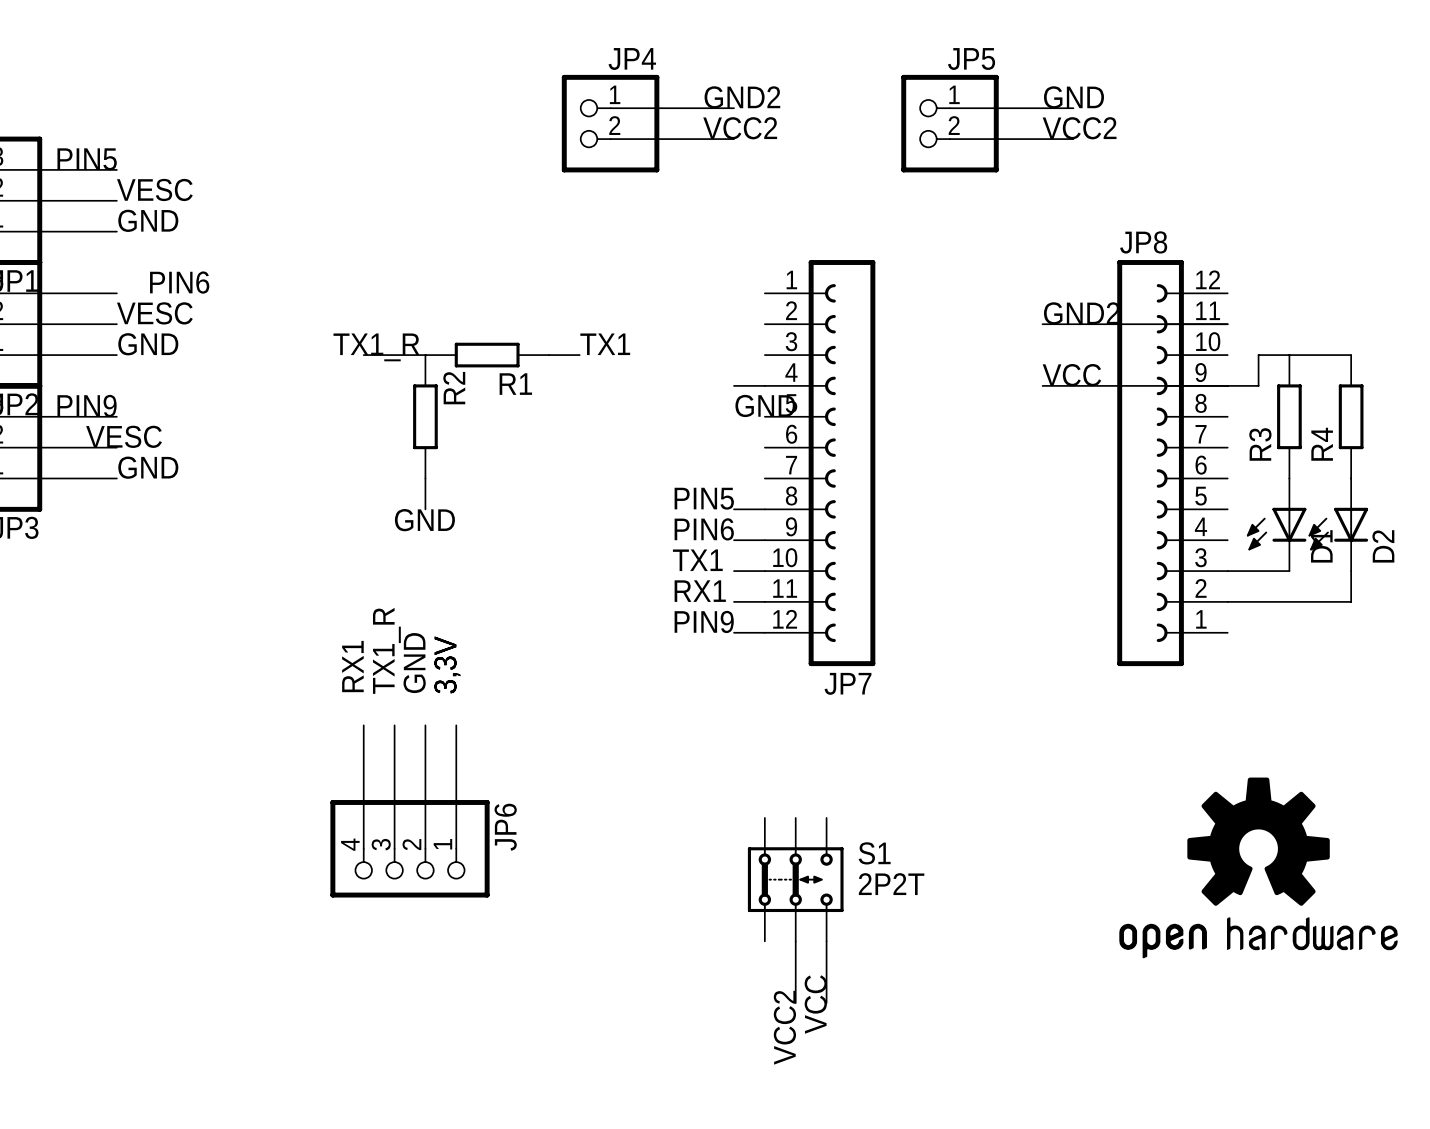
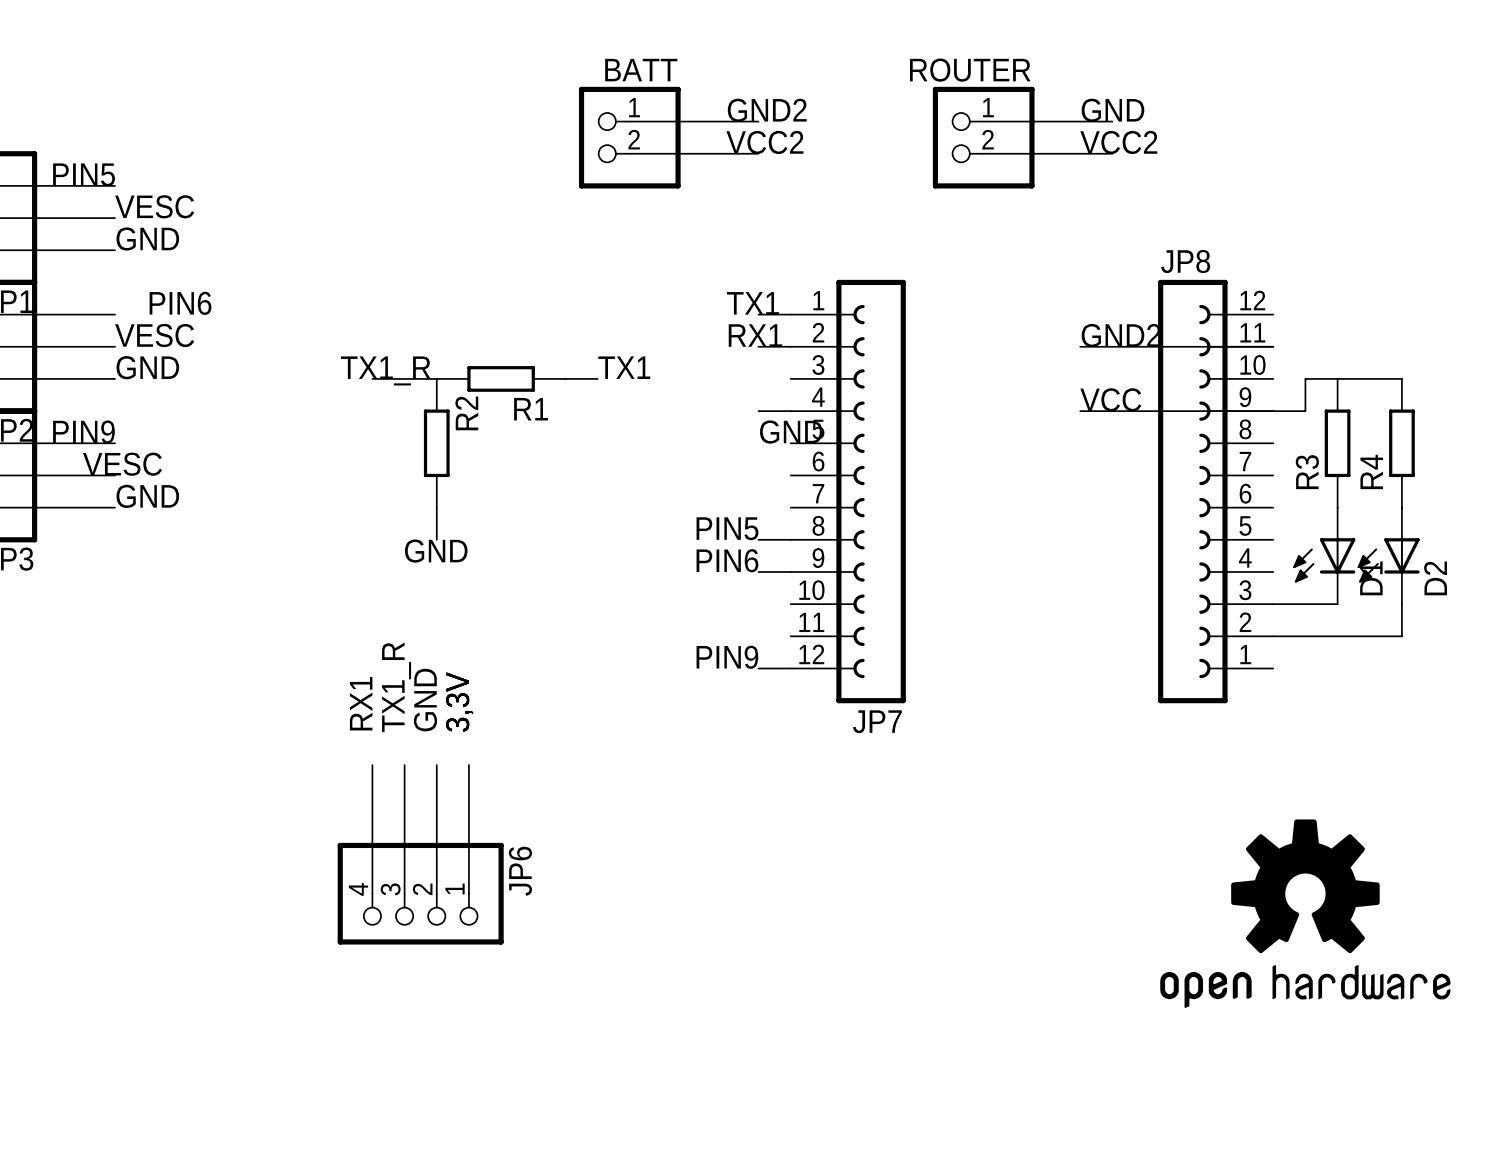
JP4 name: JP4 (632, 59) -> BATT (641, 70)
JP5 name: JP5 (971, 59) -> ROUTER (970, 70)
wire: none -> (758, 314) (790, 314)
label position: TX1 (697, 560) -> TX1 (752, 303)
wire: (734, 571) (764, 571) -> (758, 346) (790, 346)
label position: RX1 (700, 591) -> RX1 (755, 335)
wire: (734, 601) (764, 601) -> none
S1: 2P2T (795, 879) -> none
wire: (795, 941) (795, 1003) -> none
wire: (826, 941) (826, 1003) -> none
label: VCC (815, 1004) -> none
label: VCC2 (784, 1027) -> none

